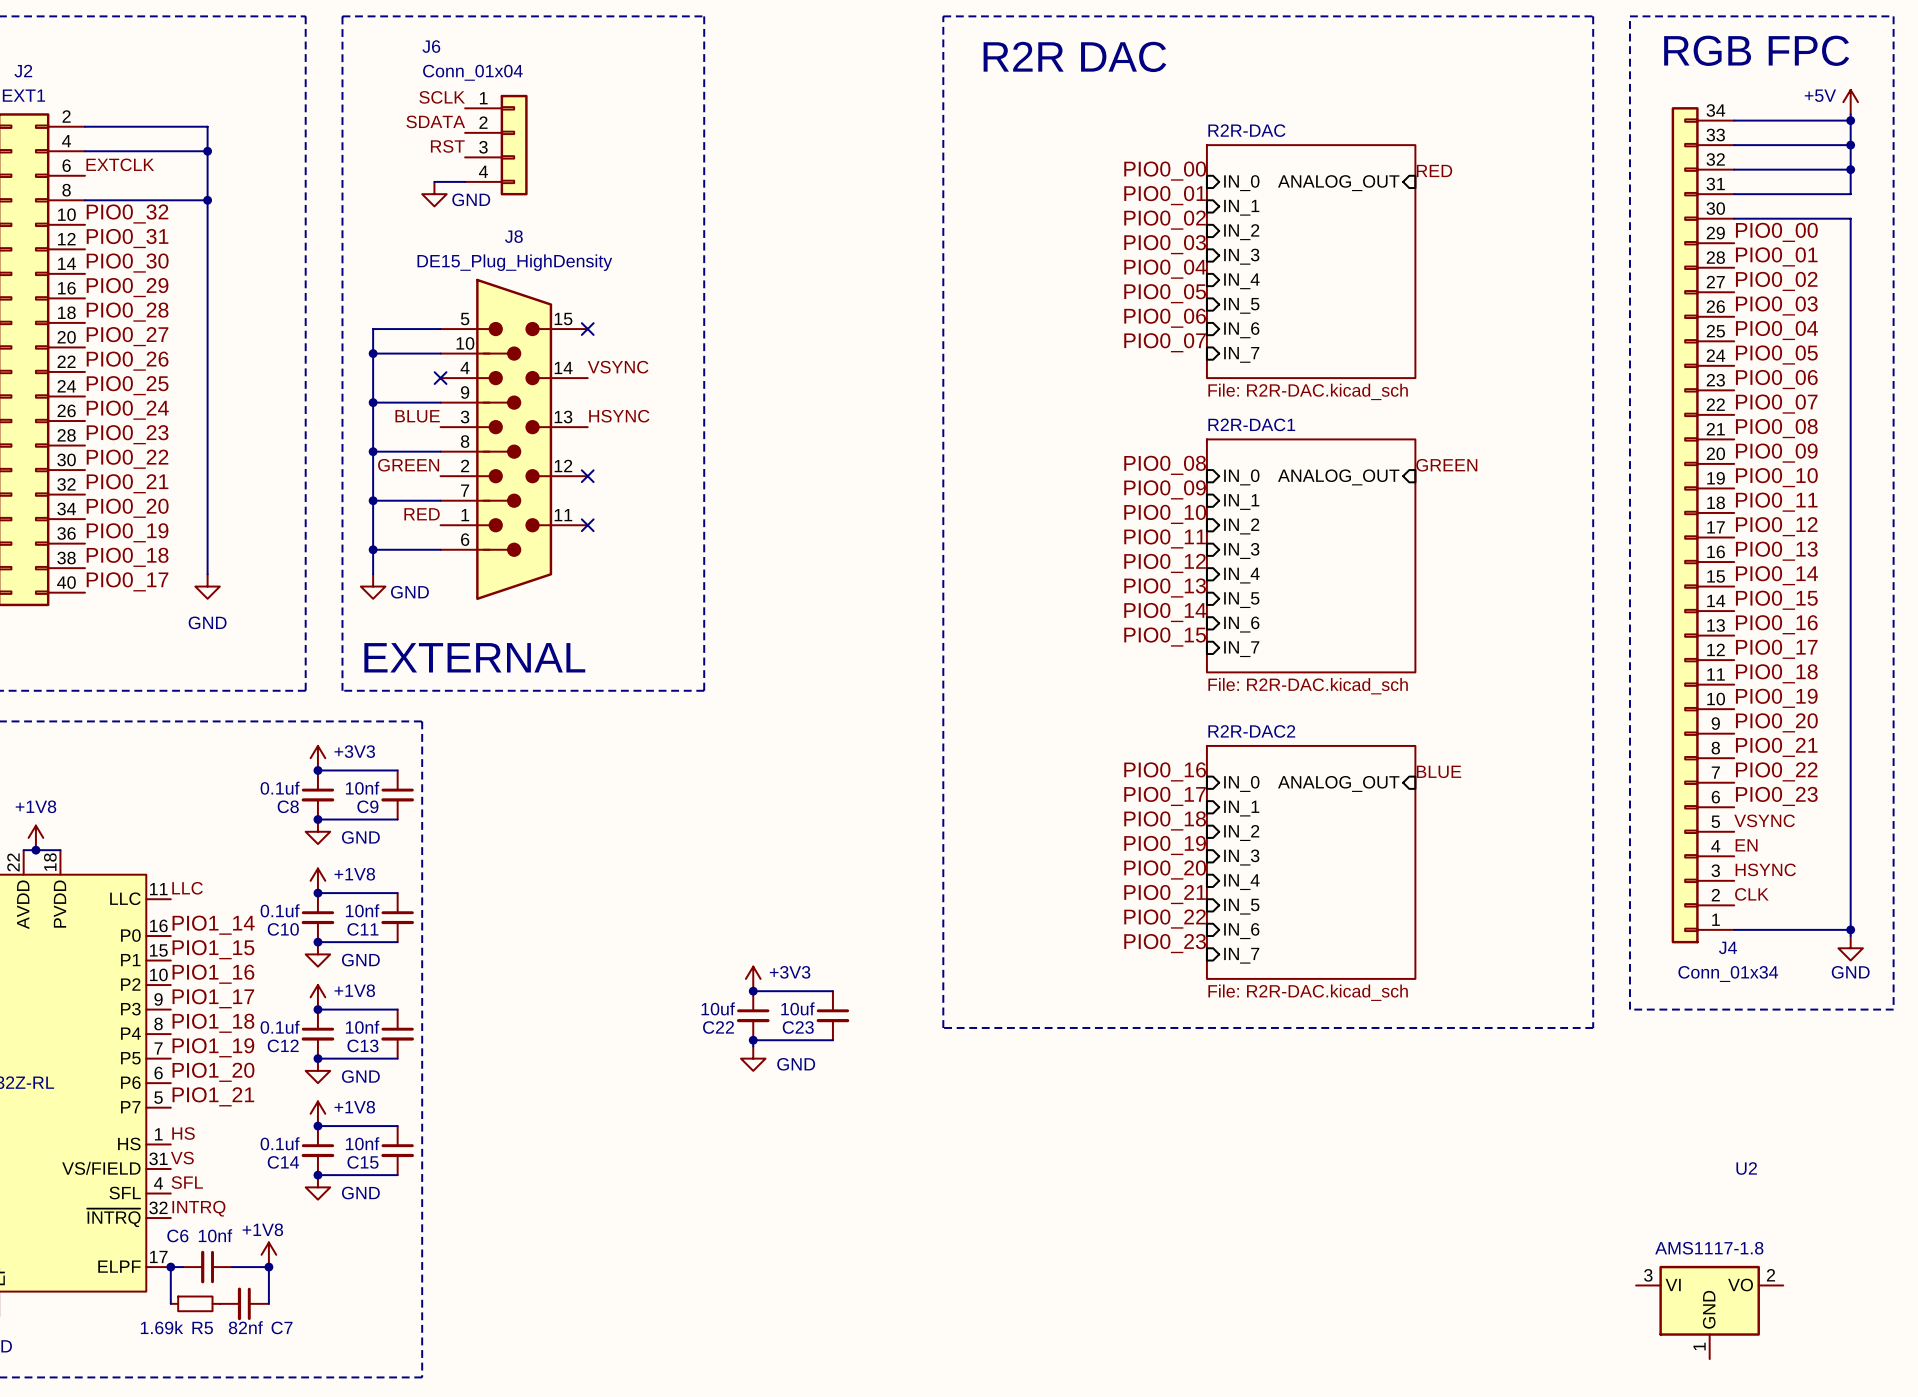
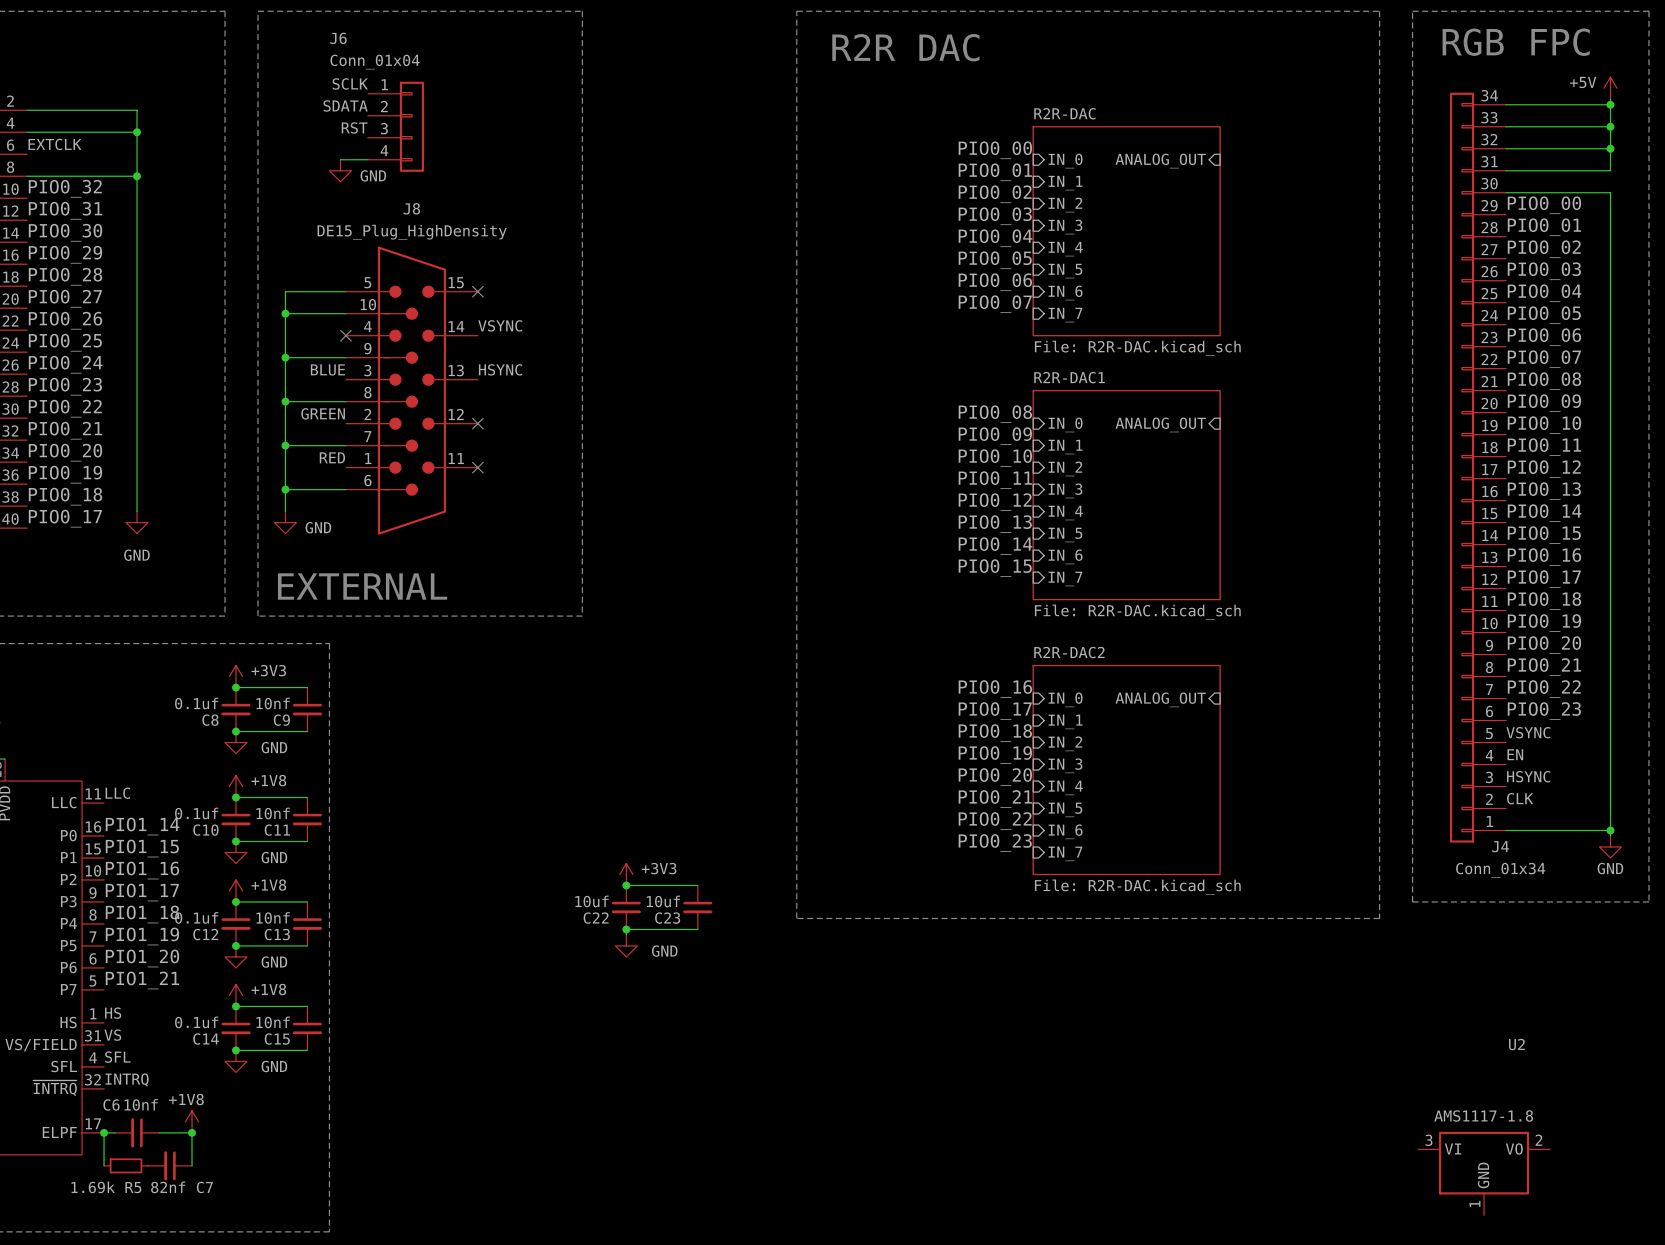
label: RED (1434, 170) -> none
label: GREEN (1446, 465) -> none
label: BLUE (1439, 771) -> none

